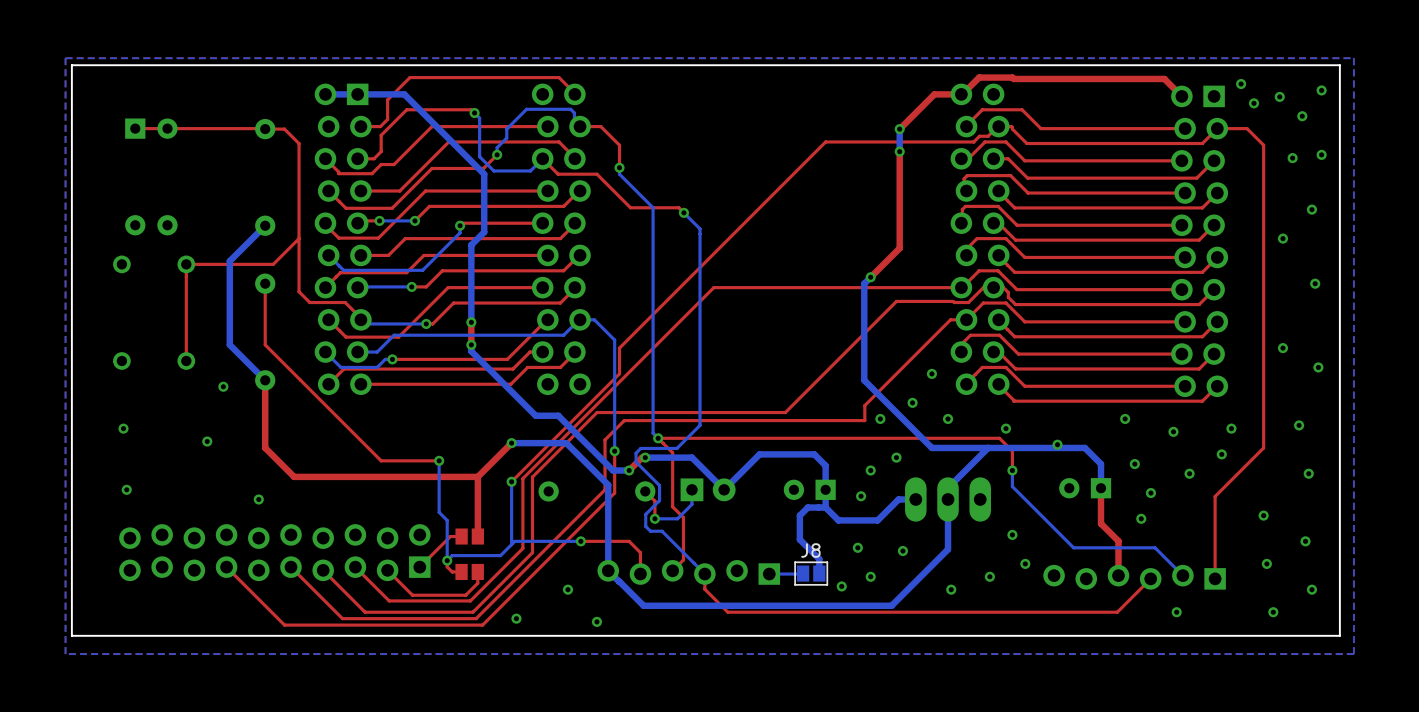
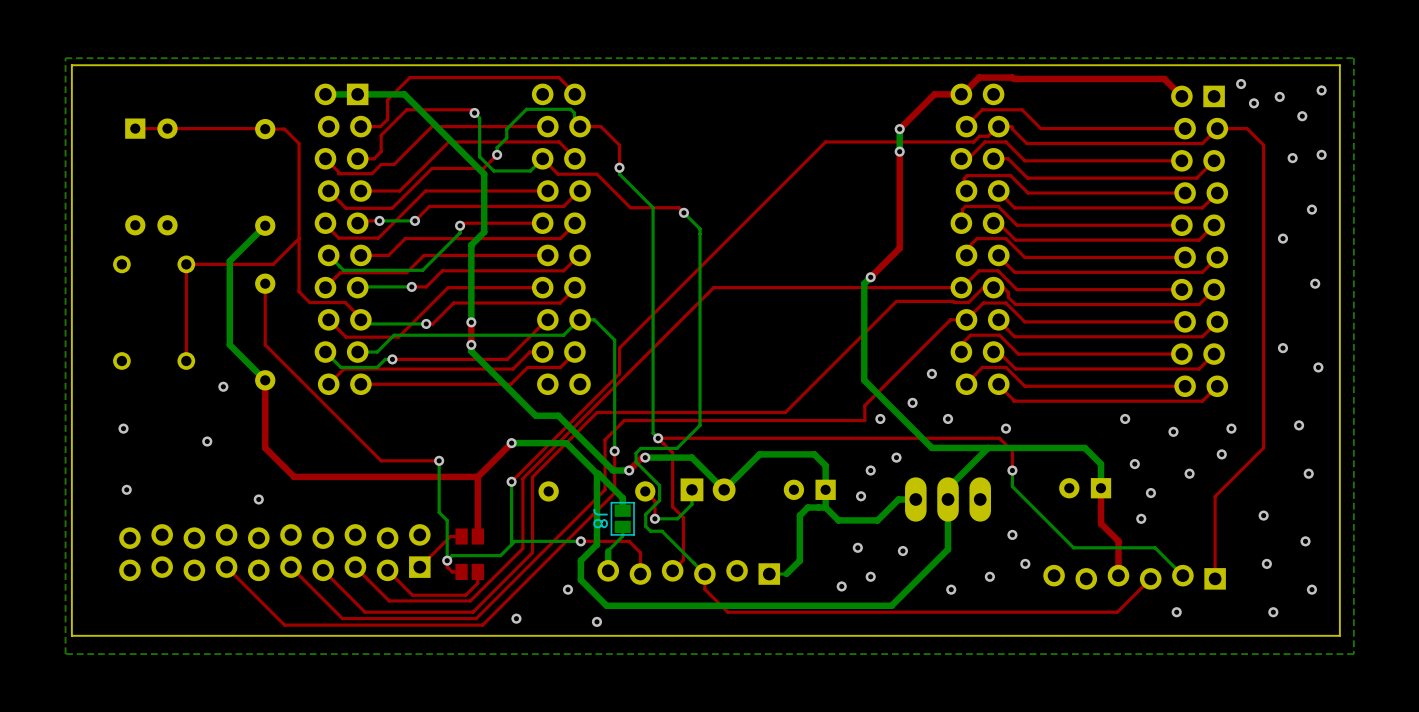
via: (1057, 444) -> none
bottom track: (596, 473) (608, 485) (608, 551) -> (622, 526) (622, 536) (608, 551)
bottom track: (799, 539) (819, 559) (819, 573) -> (799, 539) (799, 560) (786, 574)
J8 name position: J8 (810, 550) -> J8 (600, 518)
bottom track: (608, 570) (643, 605) -> (622, 510) (622, 498) (596, 473) (596, 544) (580, 560) (580, 580) (606, 605) (643, 605)
bottom track: (803, 573) (786, 574) -> none
J8 rotation: 0° (811, 573) -> 90° clockwise (622, 518)
J8 position: (811, 573) -> (622, 518)

